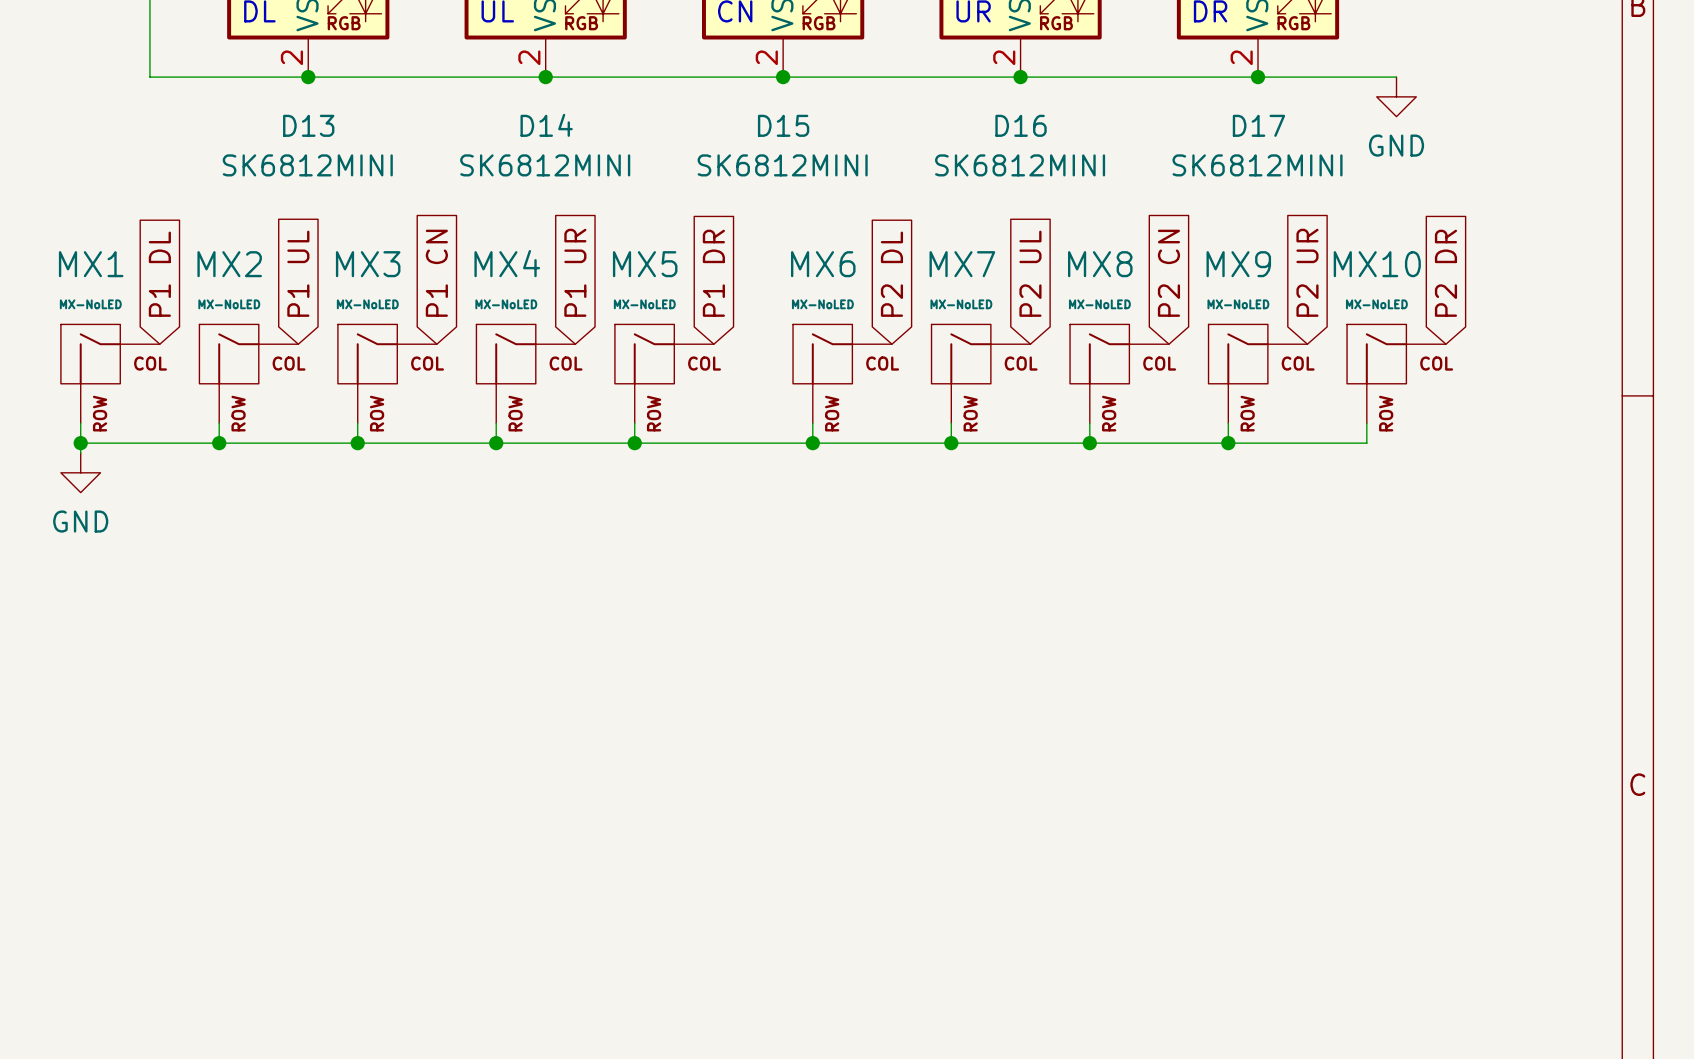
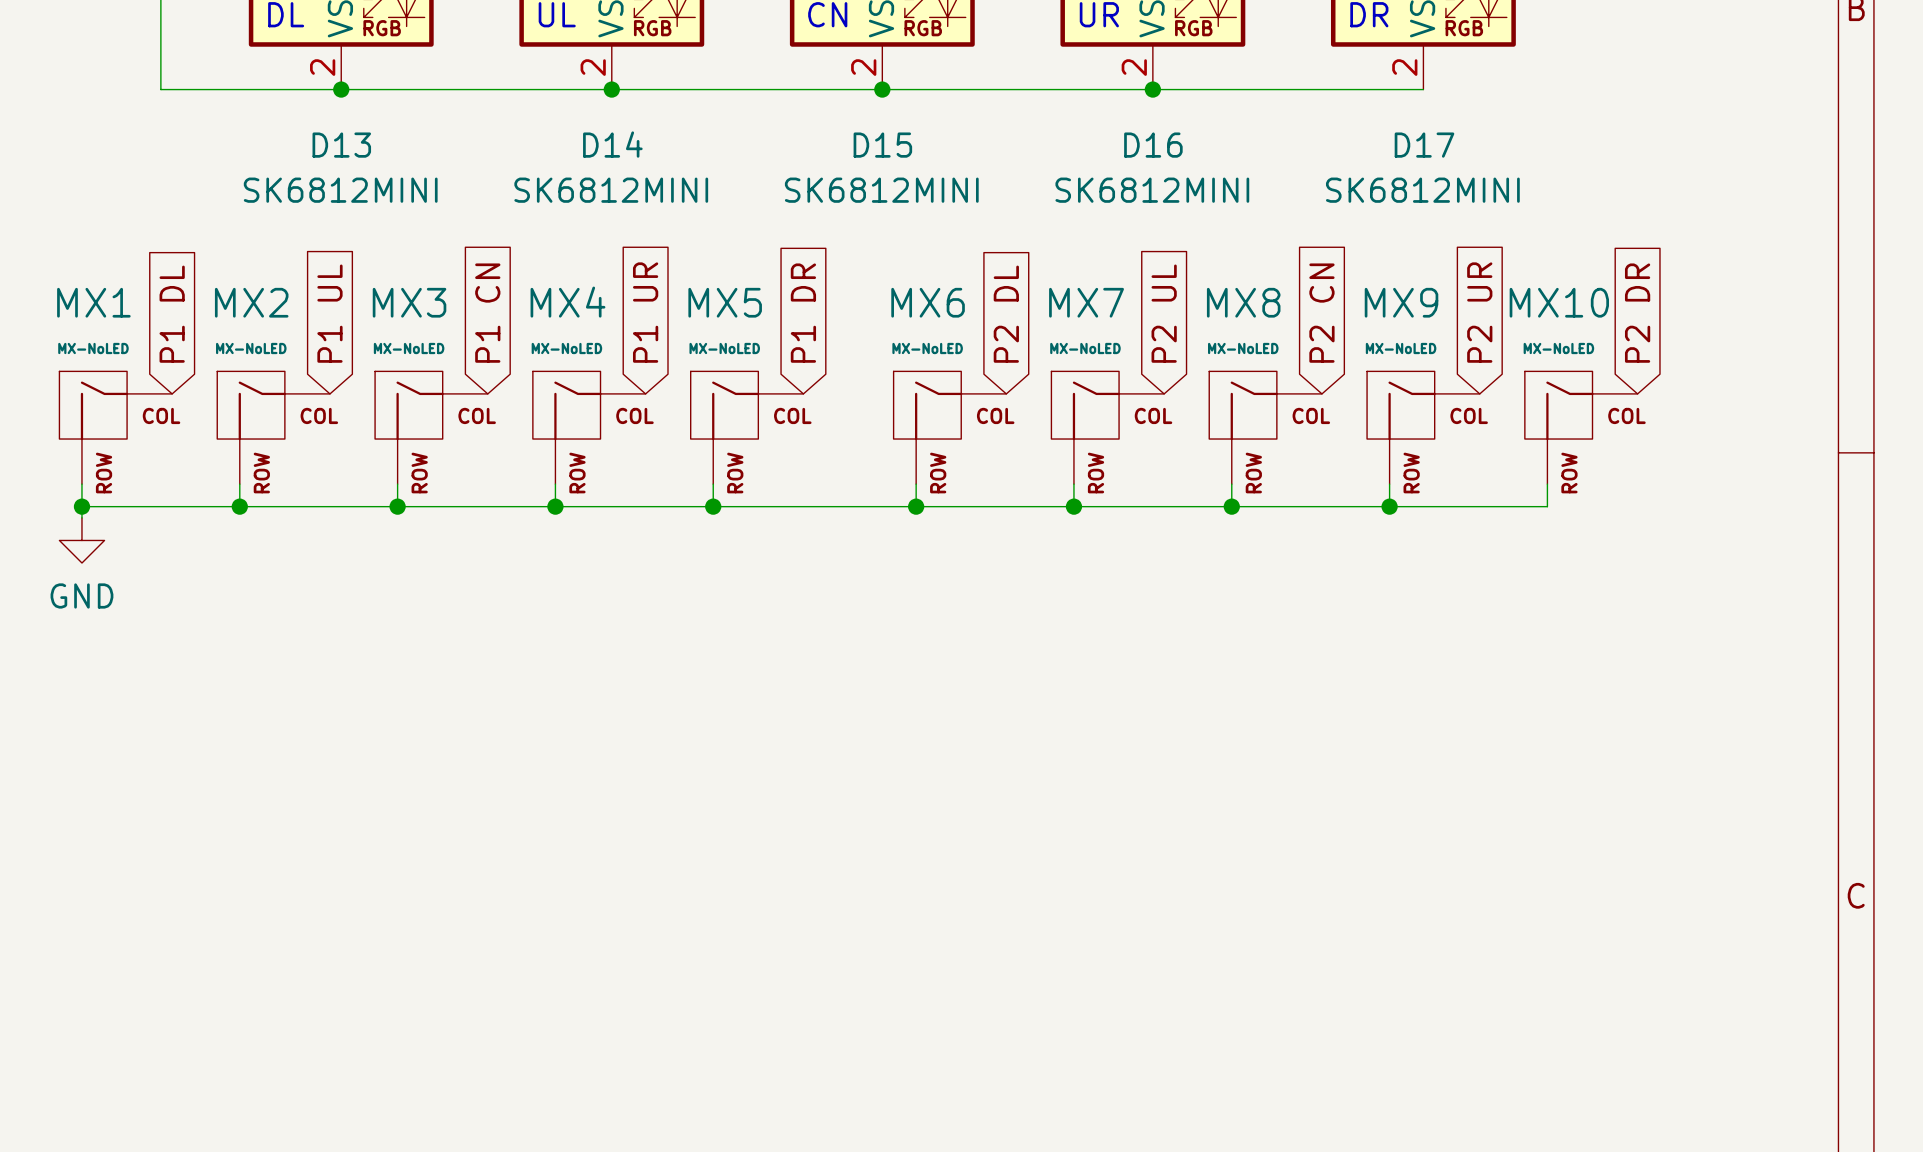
wire: (1258, 77) (1396, 77) -> none
junction: (1258, 77) -> none
power symbol: GND (1396, 96) -> none

